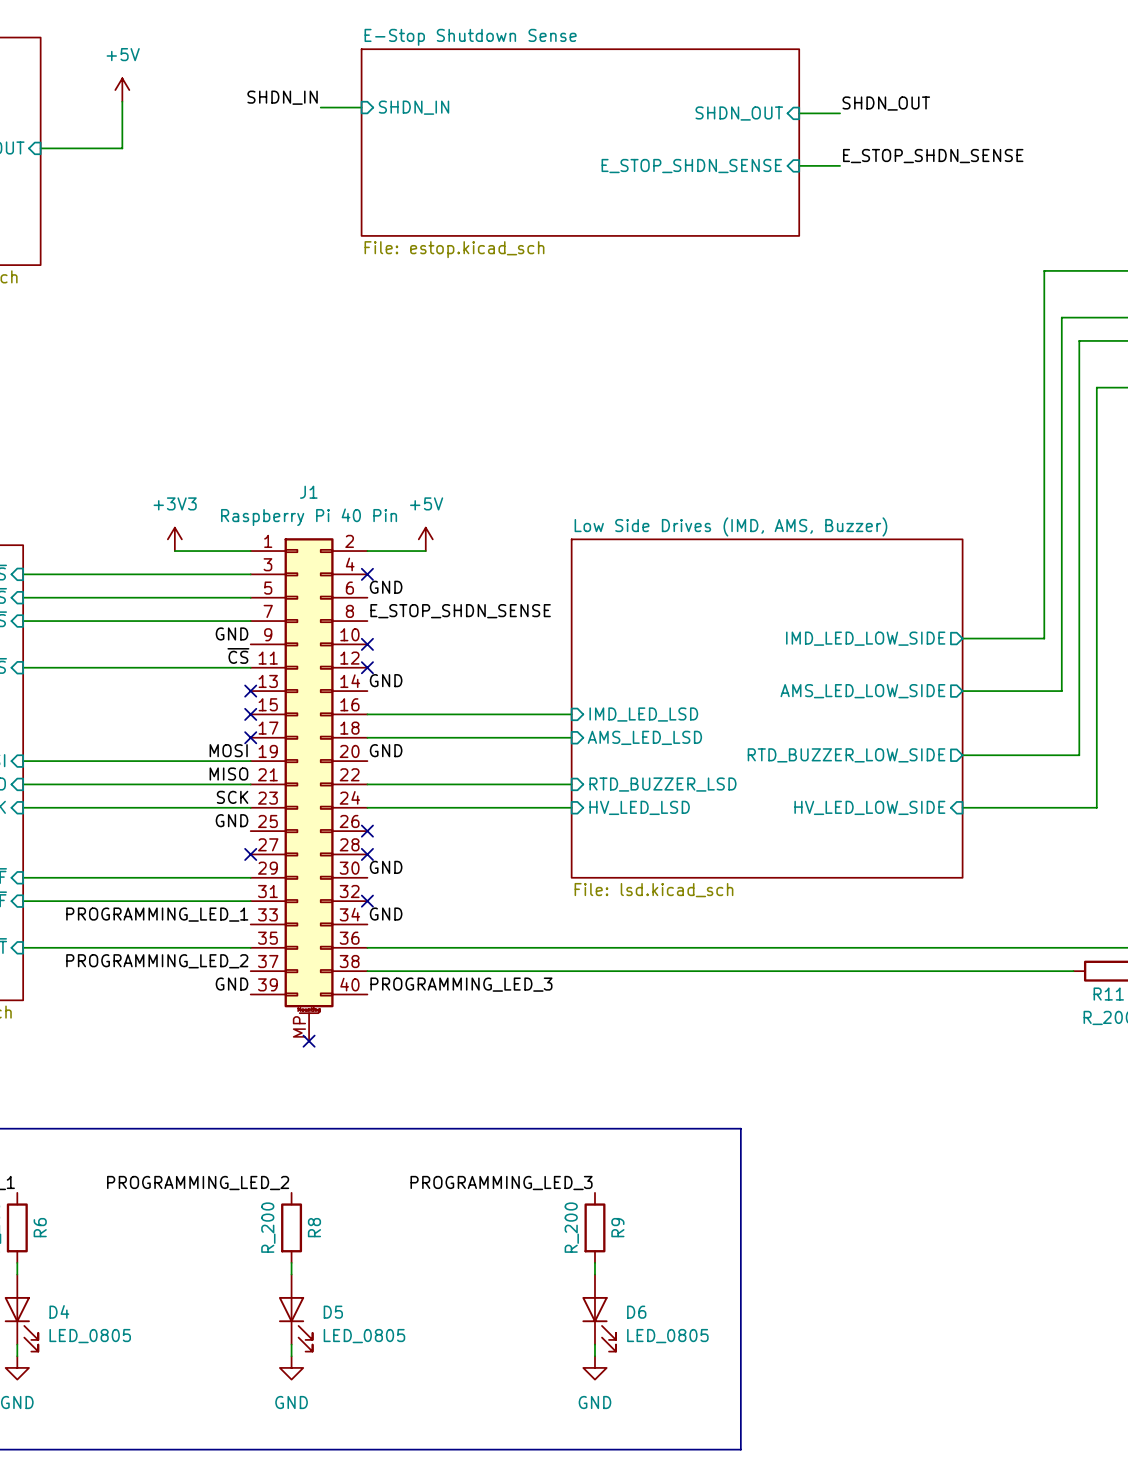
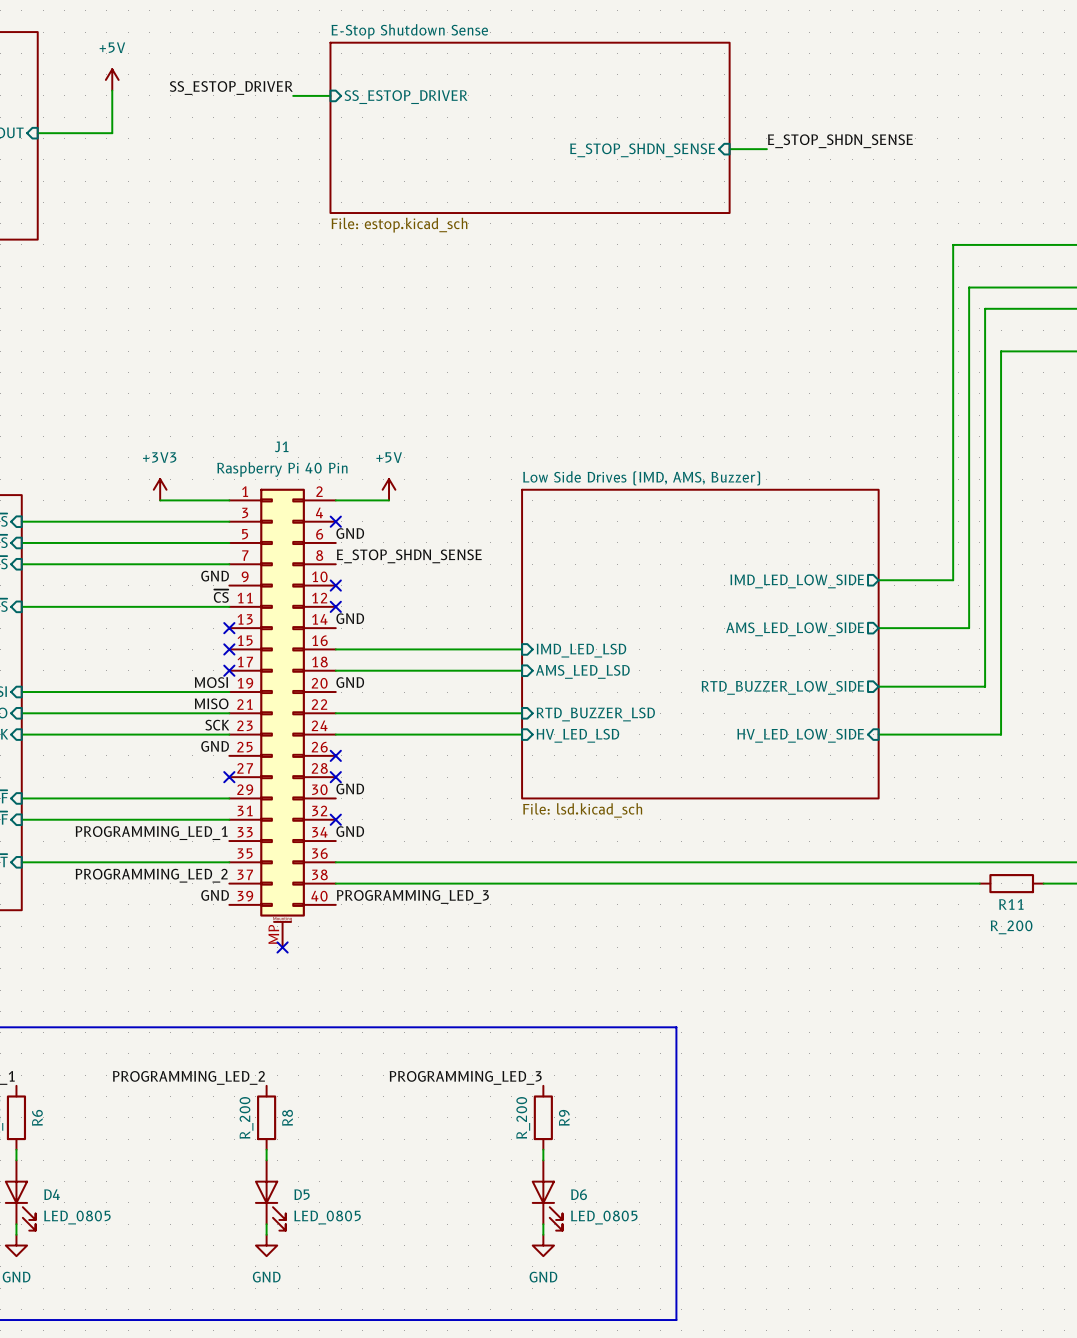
label: SHDN_IN (282, 97) -> SS_ESTOP_DRIVER (231, 88)
label: SHDN_OUT (886, 103) -> none
sheet pin: SHDN_IN (414, 107) -> SS_ESTOP_DRIVER (406, 97)
sheet pin: SHDN_OUT (739, 113) -> none
wire: (799, 113) (840, 113) -> none

